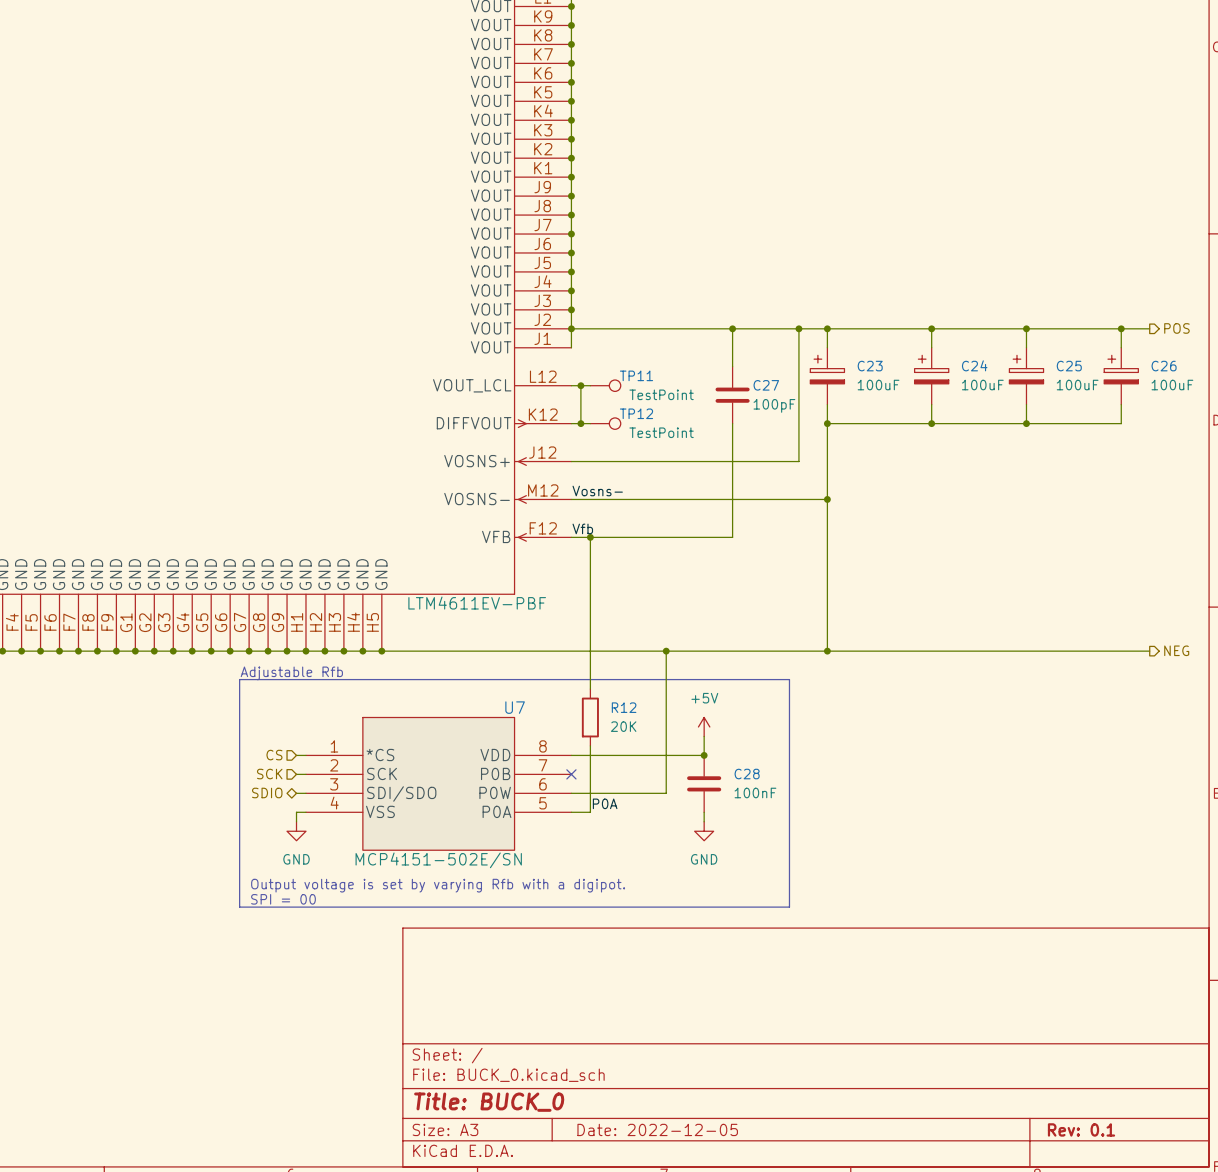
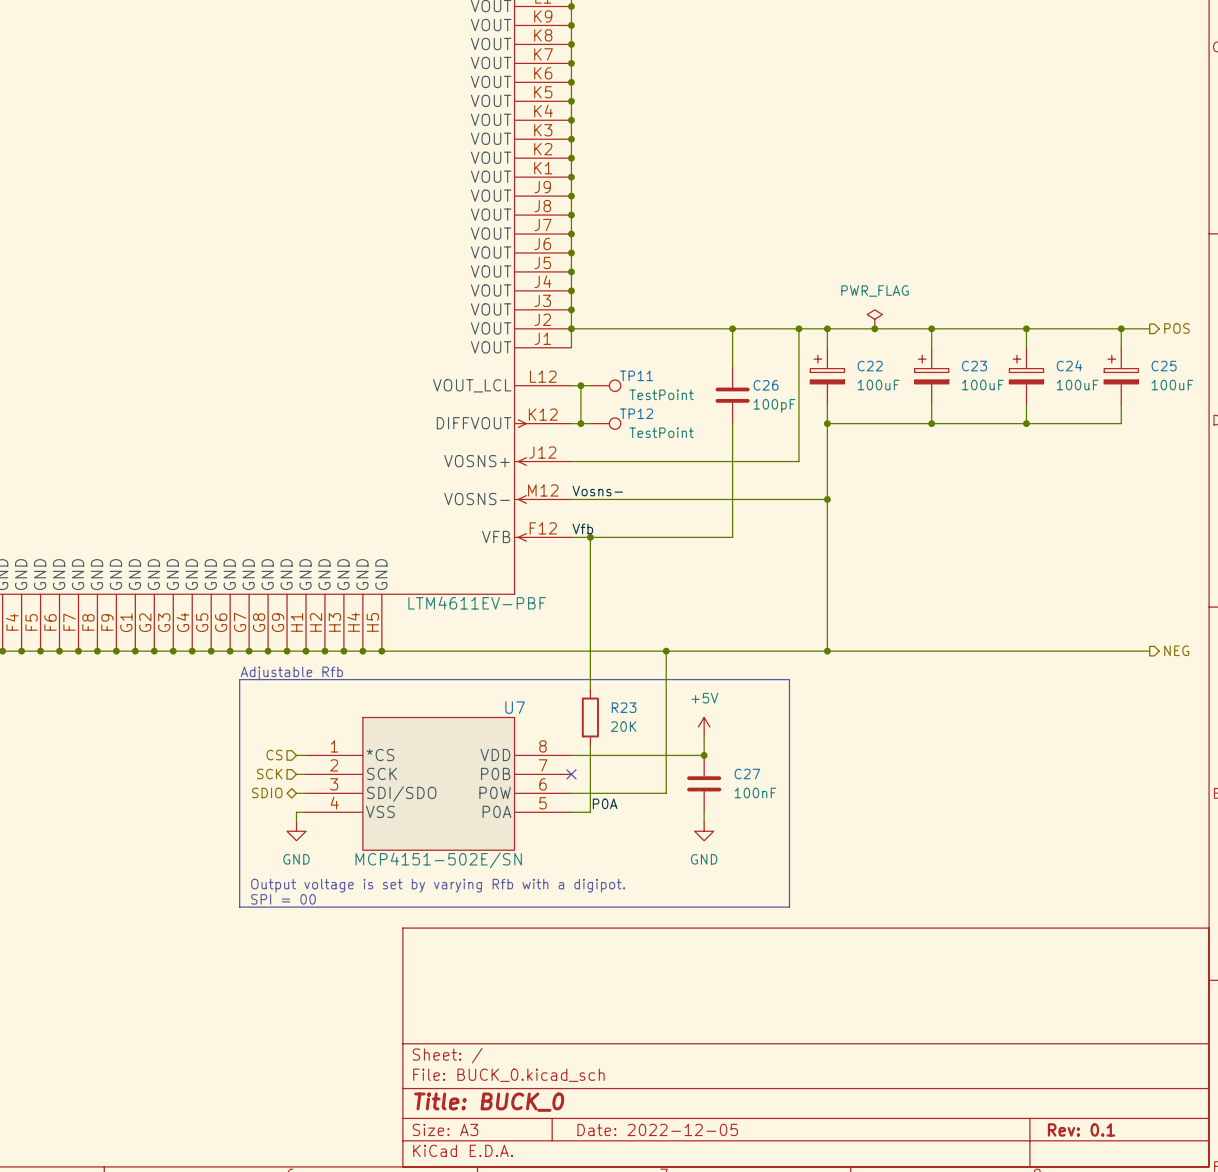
power symbol: none -> PWR_FLAG (874, 319)
junction: none -> (874, 328)
C24 name: C24 (974, 365) -> C23 (974, 366)
C23 name: C23 (870, 366) -> C22 (870, 366)
C25 name: C25 (1069, 366) -> C24 (1069, 365)
C26 name: C26 (1164, 366) -> C25 (1164, 366)
C27 name: C27 (766, 385) -> C26 (766, 385)
R12 name: R12 (624, 707) -> R23 (624, 707)
C28 name: C28 (747, 774) -> C27 (747, 774)

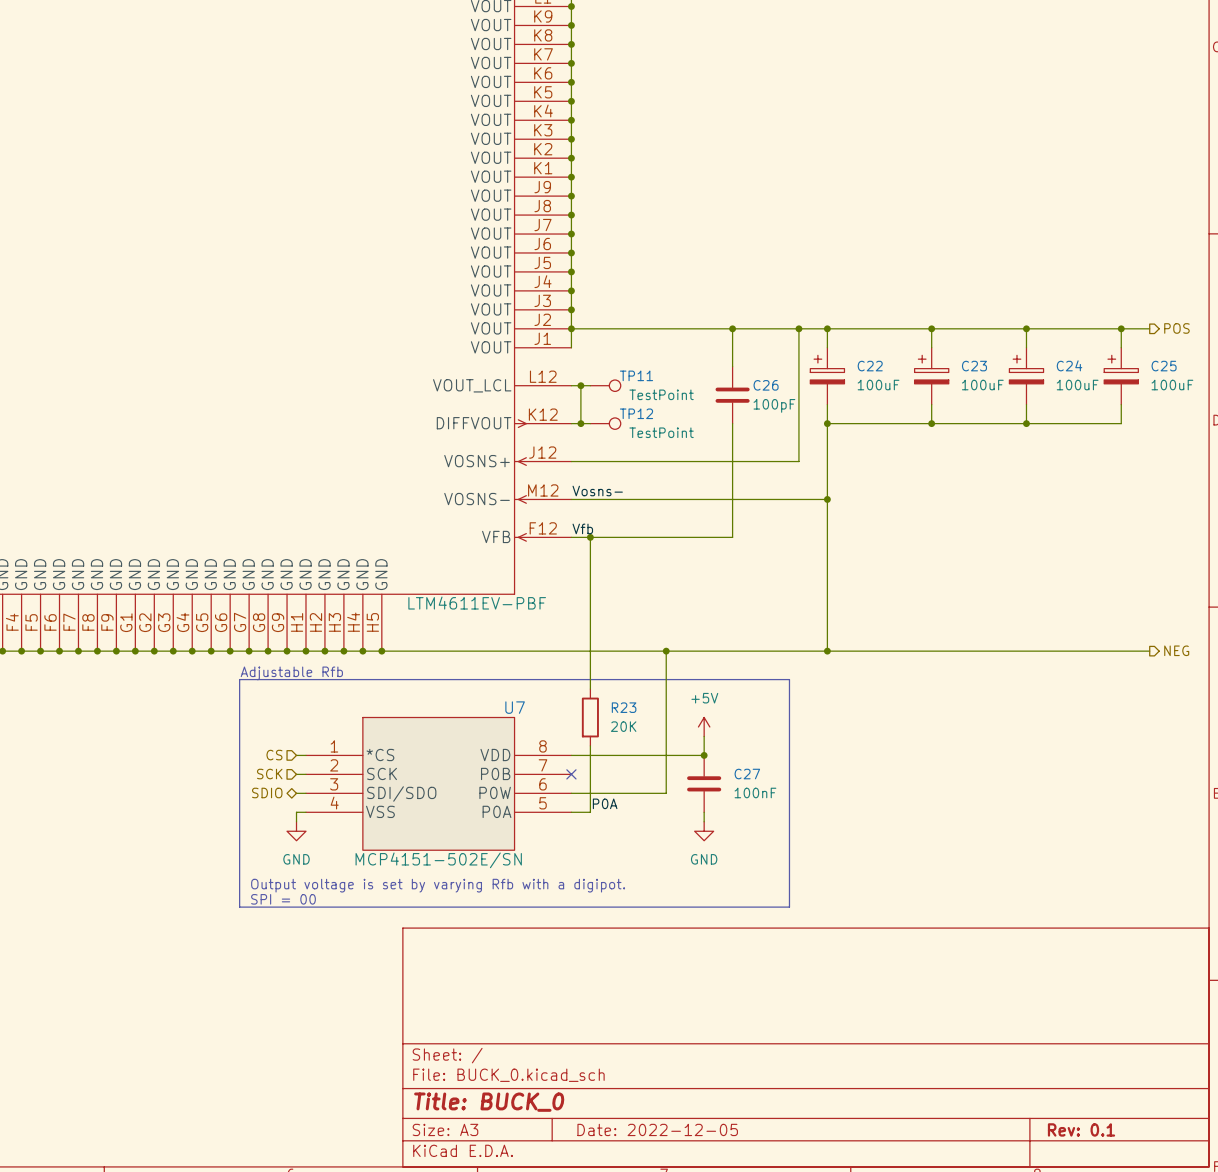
power symbol: PWR_FLAG (874, 319) -> none
junction: (874, 328) -> none

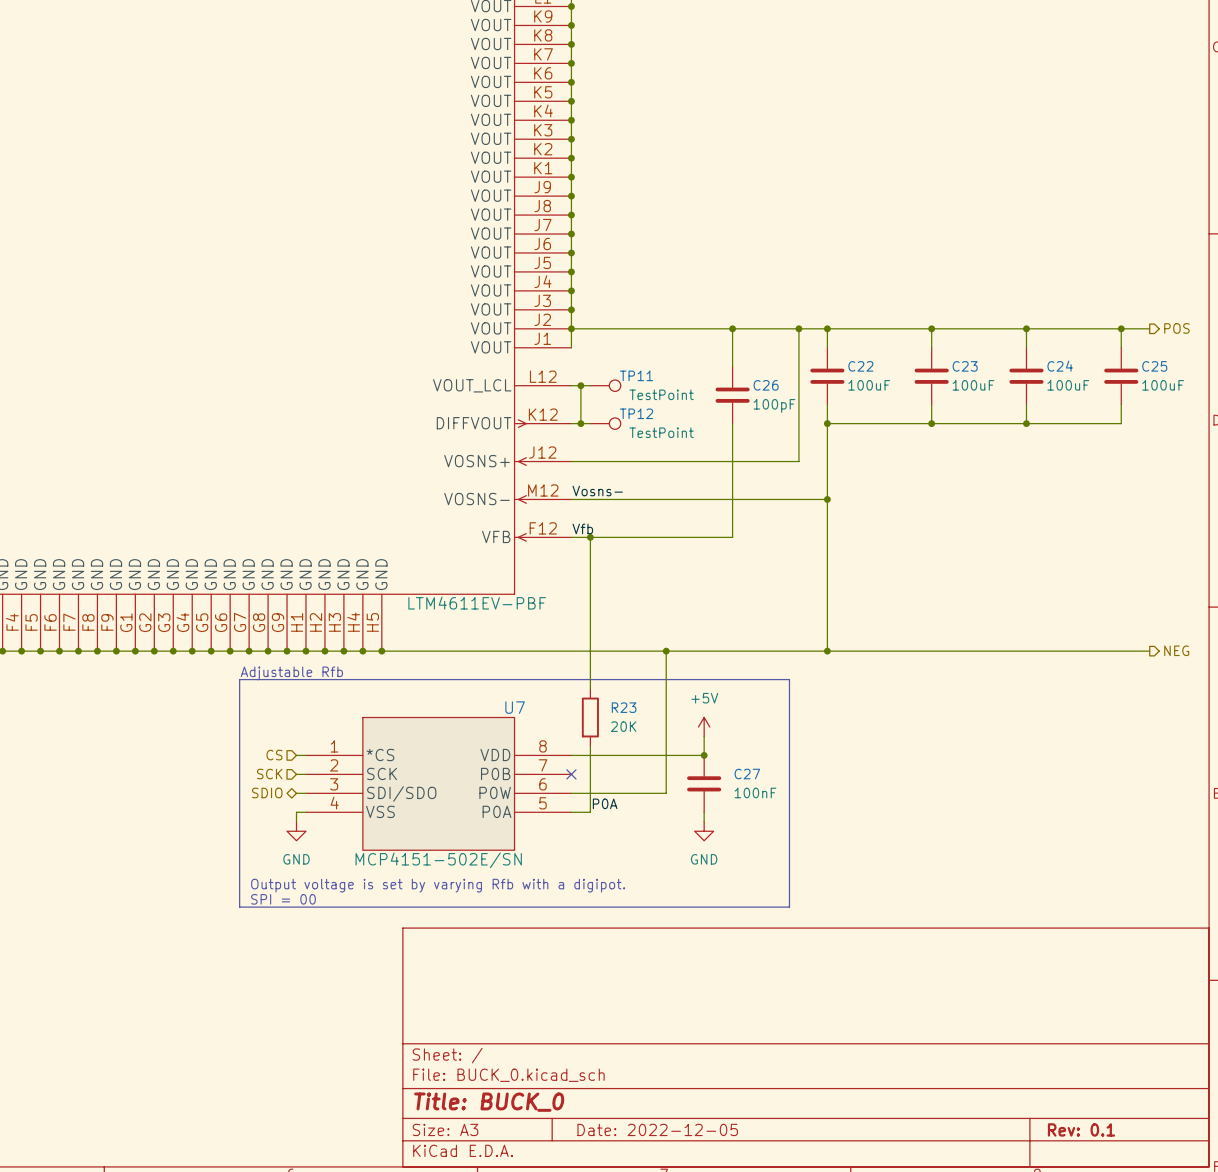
C22 symbol: [810, 347, 845, 405] -> [810, 347, 845, 405]
C23 symbol: [914, 347, 949, 405] -> [914, 347, 949, 405]
C24 symbol: [1009, 347, 1044, 405] -> [1009, 347, 1044, 405]
C25 symbol: [1104, 347, 1139, 405] -> [1104, 347, 1139, 405]

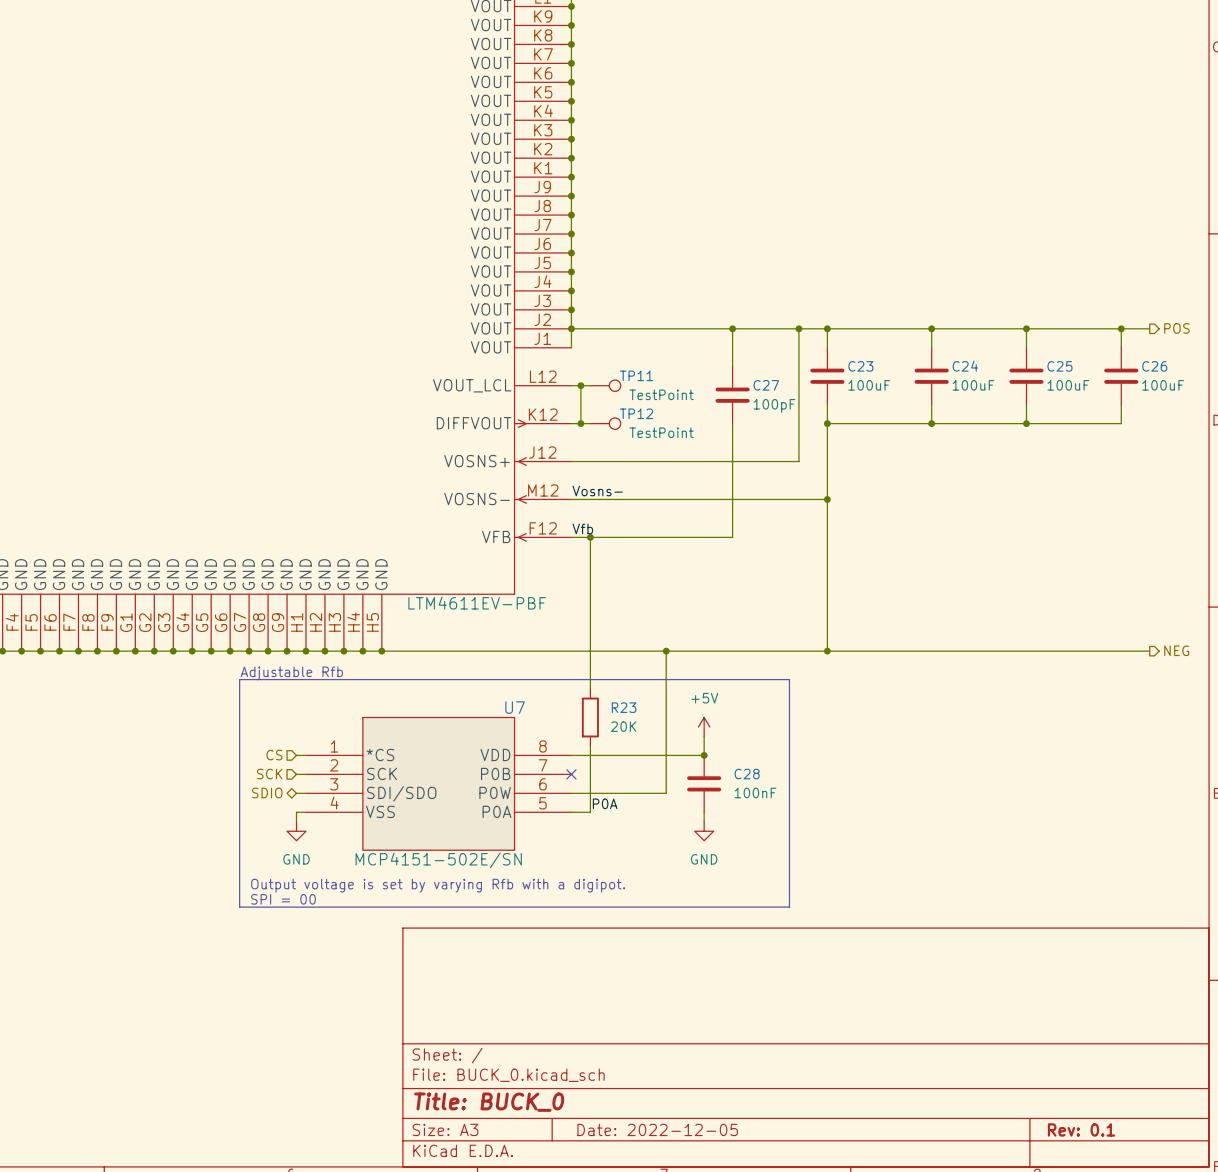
C22 name: C22 (860, 366) -> C23 (860, 366)
C23 name: C23 (965, 366) -> C24 (965, 366)
C24 name: C24 (1060, 366) -> C25 (1059, 366)
C25 name: C25 (1154, 366) -> C26 (1154, 366)
C26 name: C26 (766, 385) -> C27 (766, 385)
C27 name: C27 (747, 774) -> C28 (747, 774)

